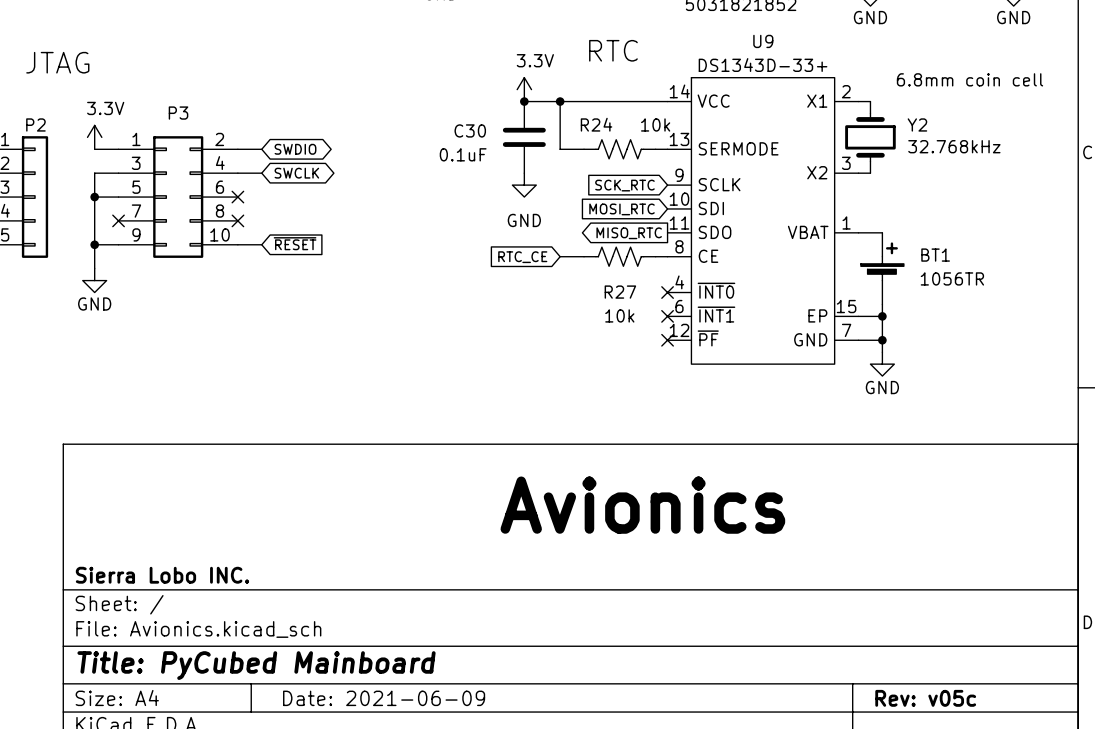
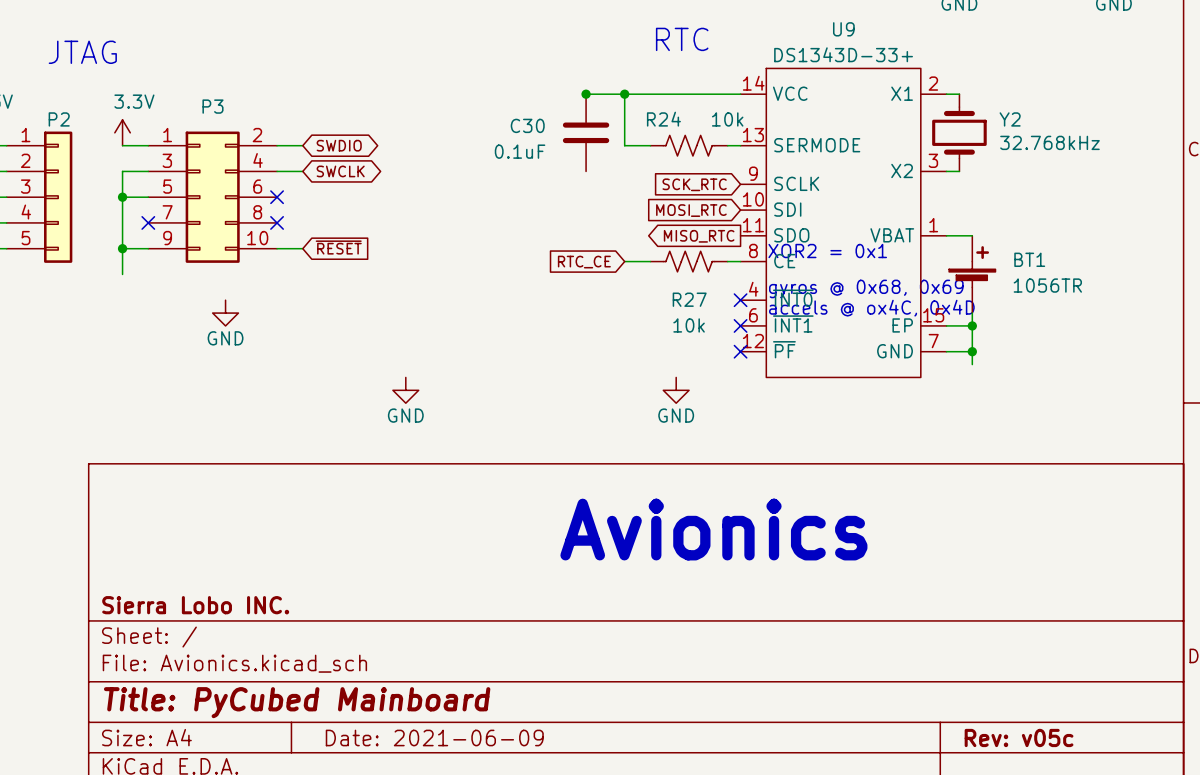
text: 6.8mm coin cell (970, 79) -> none
power symbol: 3.3V (524, 89) -> none
power symbol: GND (524, 185) -> none
text: none -> XOR2 = 0x1 (827, 251)
power symbol position: GND (94, 280) -> GND (225, 313)
text: none -> gyros @ 0x68, 0x69 (866, 288)
text: none -> accels @ ox4C, 0x4D (871, 308)
power symbol: GND (882, 364) -> none
power symbol: none -> GND (405, 390)
power symbol: none -> GND (676, 390)

